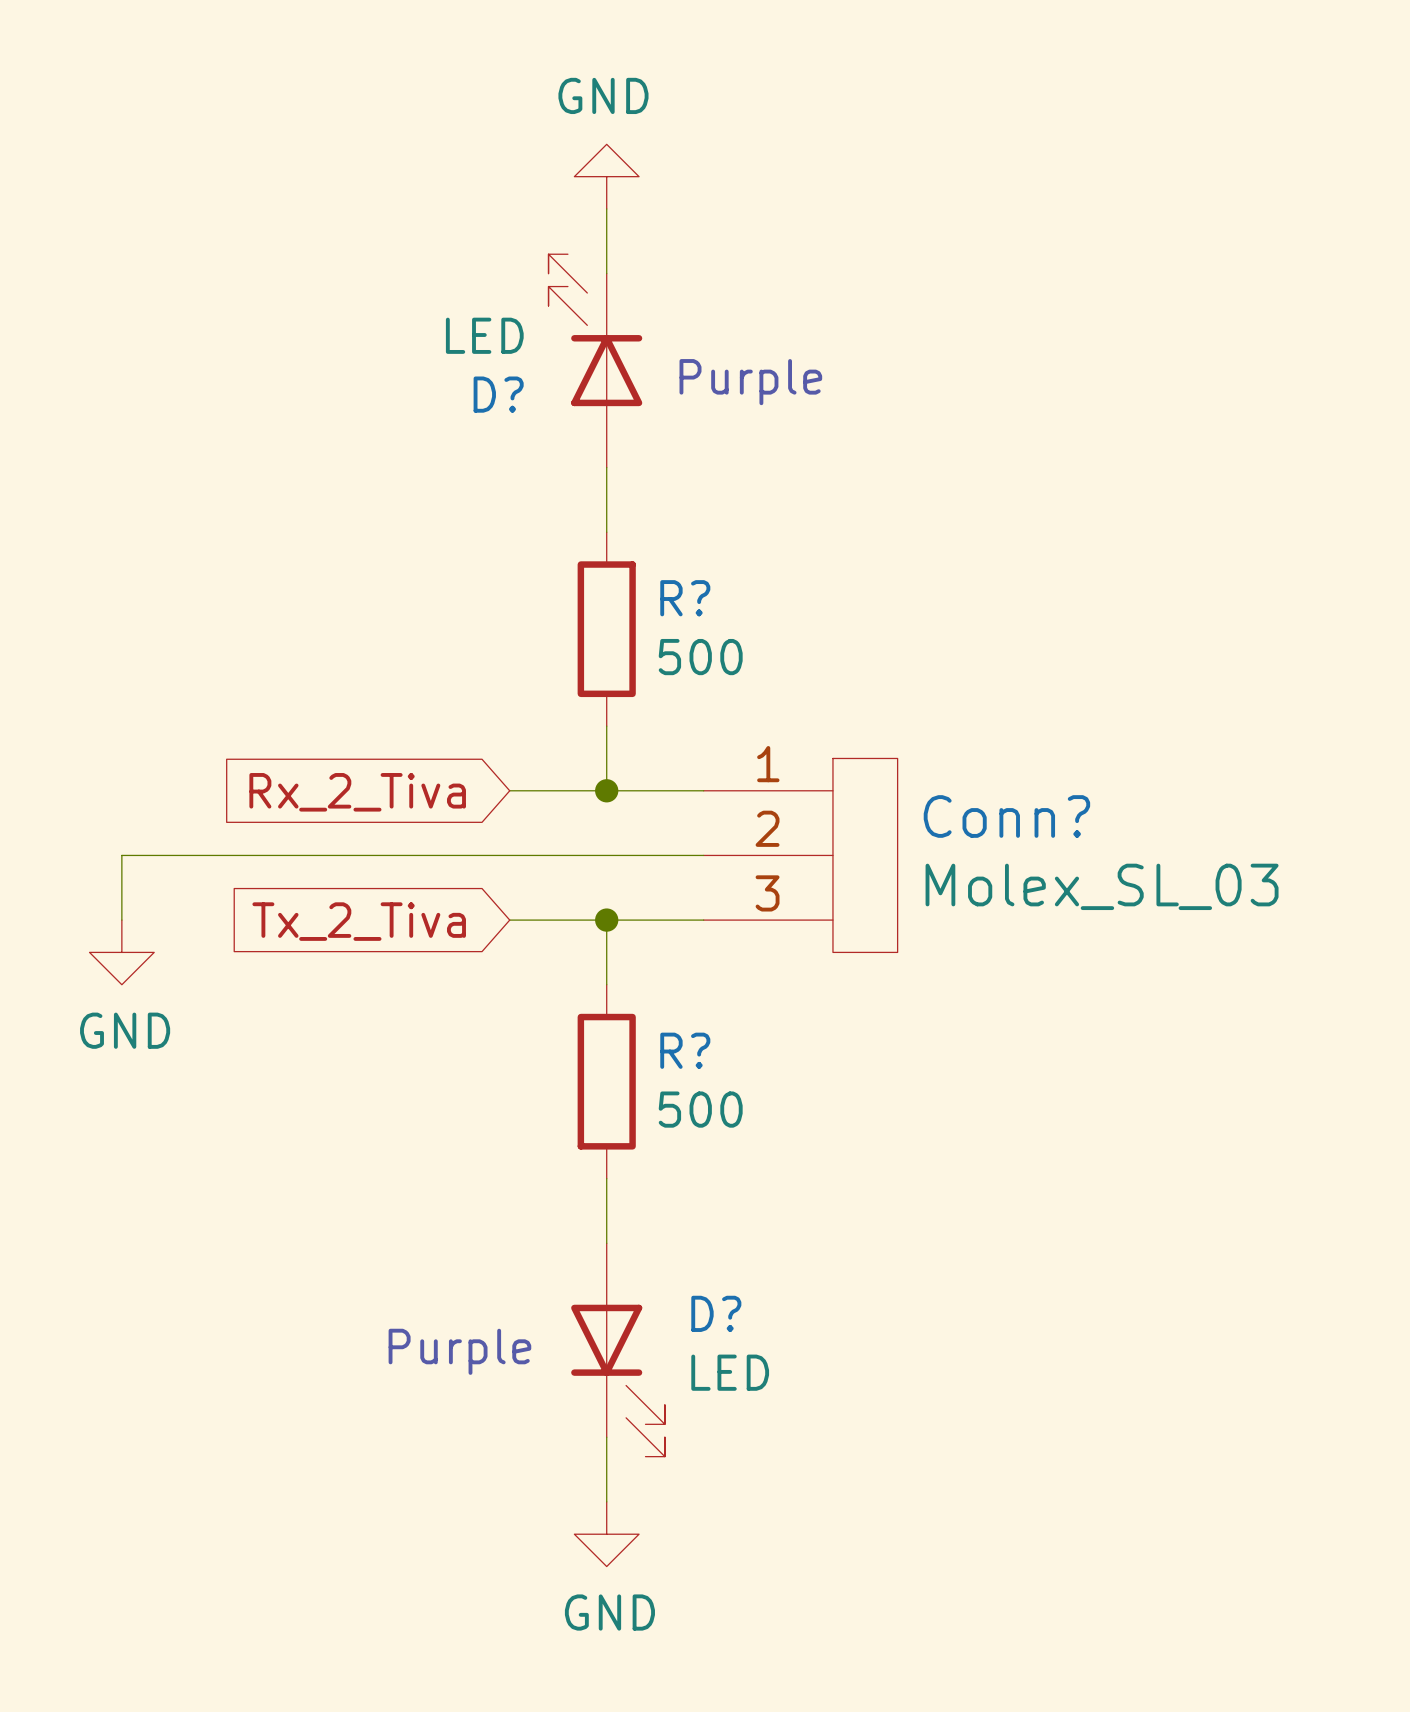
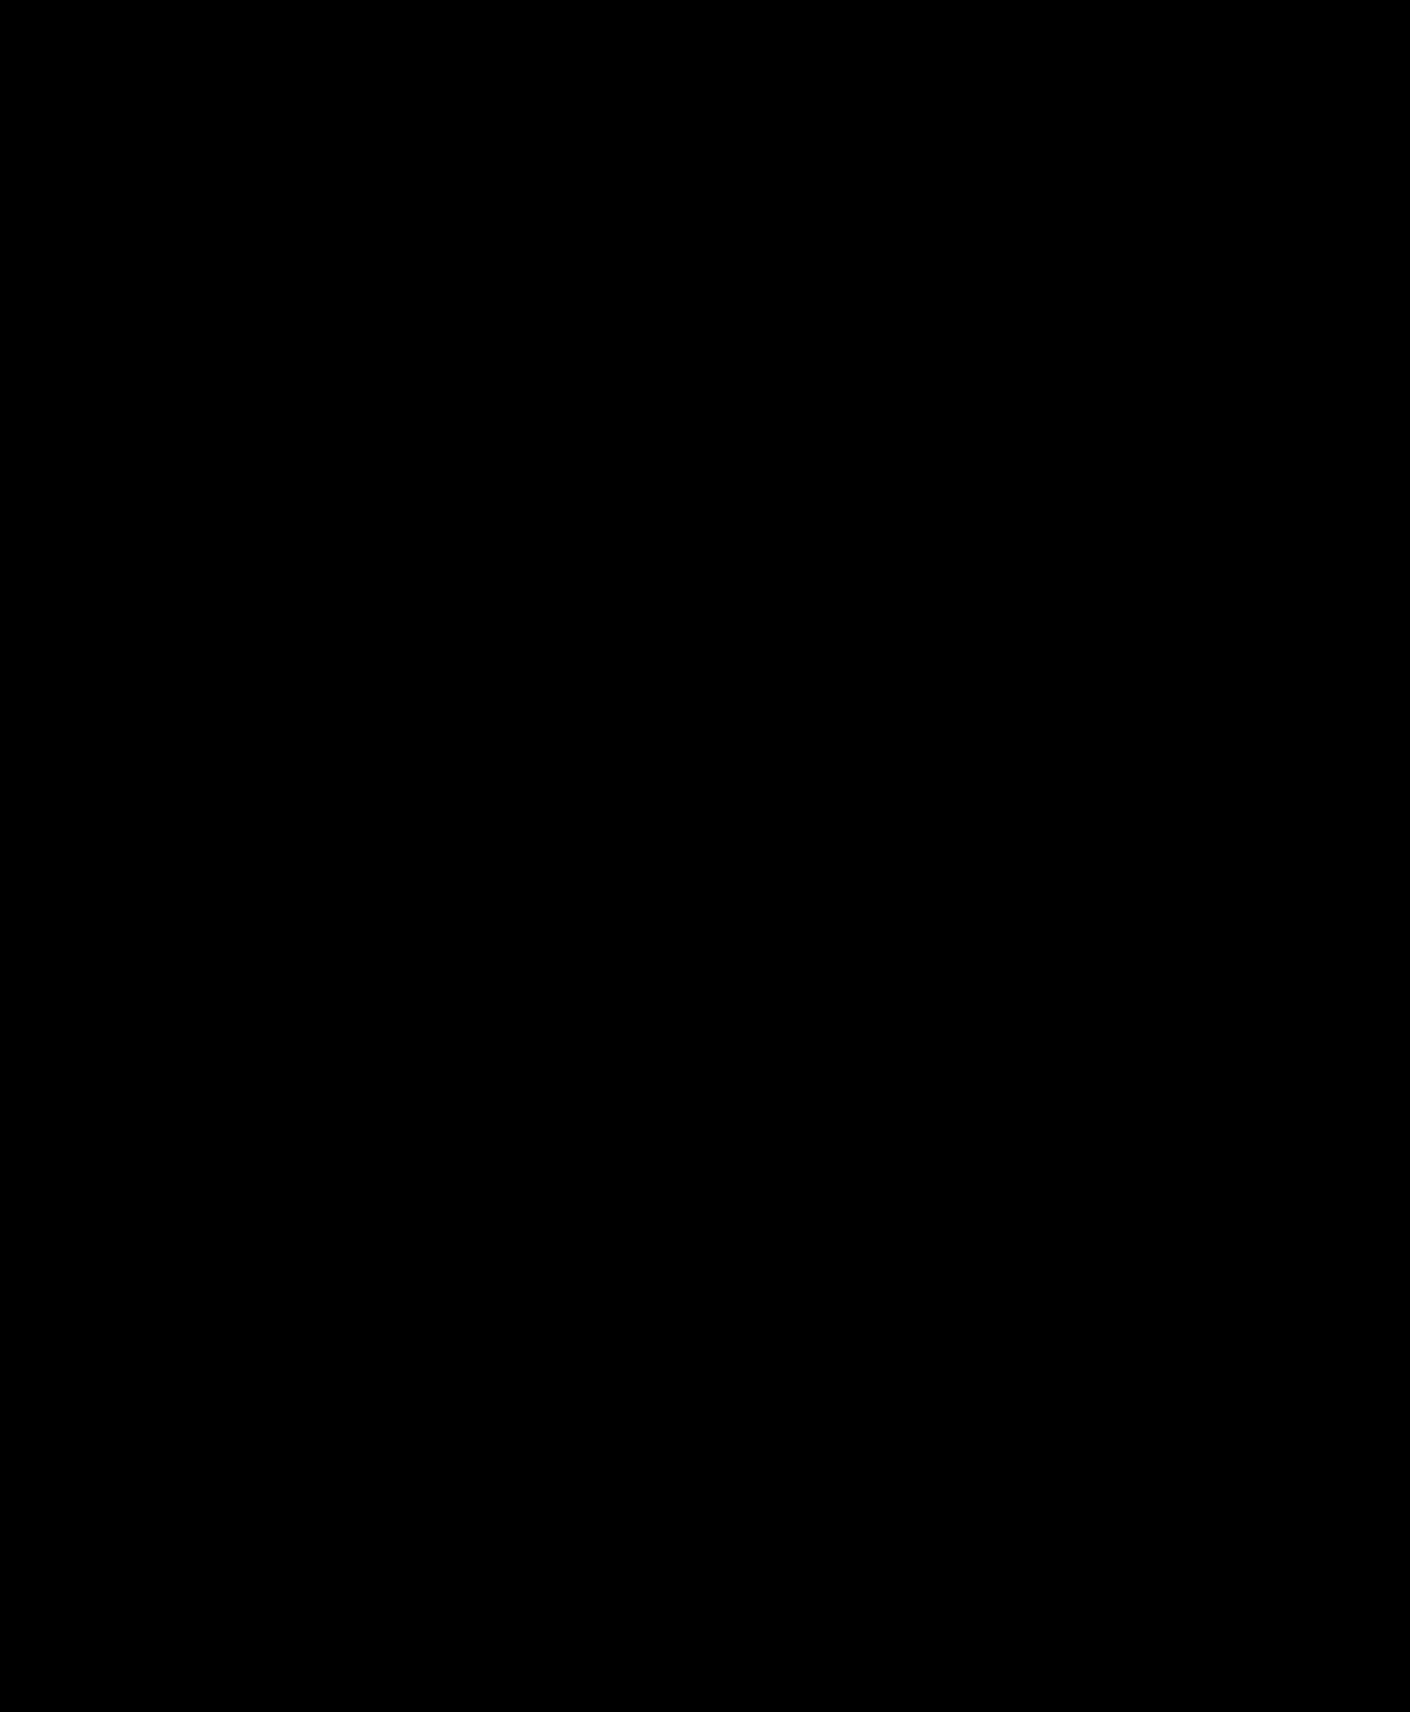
power symbol: GND (606, 176) -> none
wire: (606, 208) (606, 273) -> none
D?: LED (595, 360) -> none
text: Purple (750, 382) -> none
wire: (606, 467) (606, 532) -> none
R?: 500 (606, 629) -> none
wire: (606, 726) (606, 790) -> none
wire: (509, 790) (703, 790) -> none
junction: (606, 790) -> none
global label: Rx_2_Tiva (357, 792) -> none
wire: (703, 855) (121, 855) (121, 920) -> none
Conn?: Molex_SL_03 (800, 855) -> none
wire: (509, 920) (703, 920) -> none
wire: (606, 920) (606, 984) -> none
junction: (606, 920) -> none
global label: Tx_2_Tiva (359, 921) -> none
power symbol: GND (121, 952) -> none
R?: 500 (606, 1081) -> none
wire: (606, 1178) (606, 1243) -> none
D?: LED (618, 1349) -> none
text: Purple (459, 1351) -> none
wire: (606, 1437) (606, 1501) -> none
power symbol: GND (606, 1534) -> none

